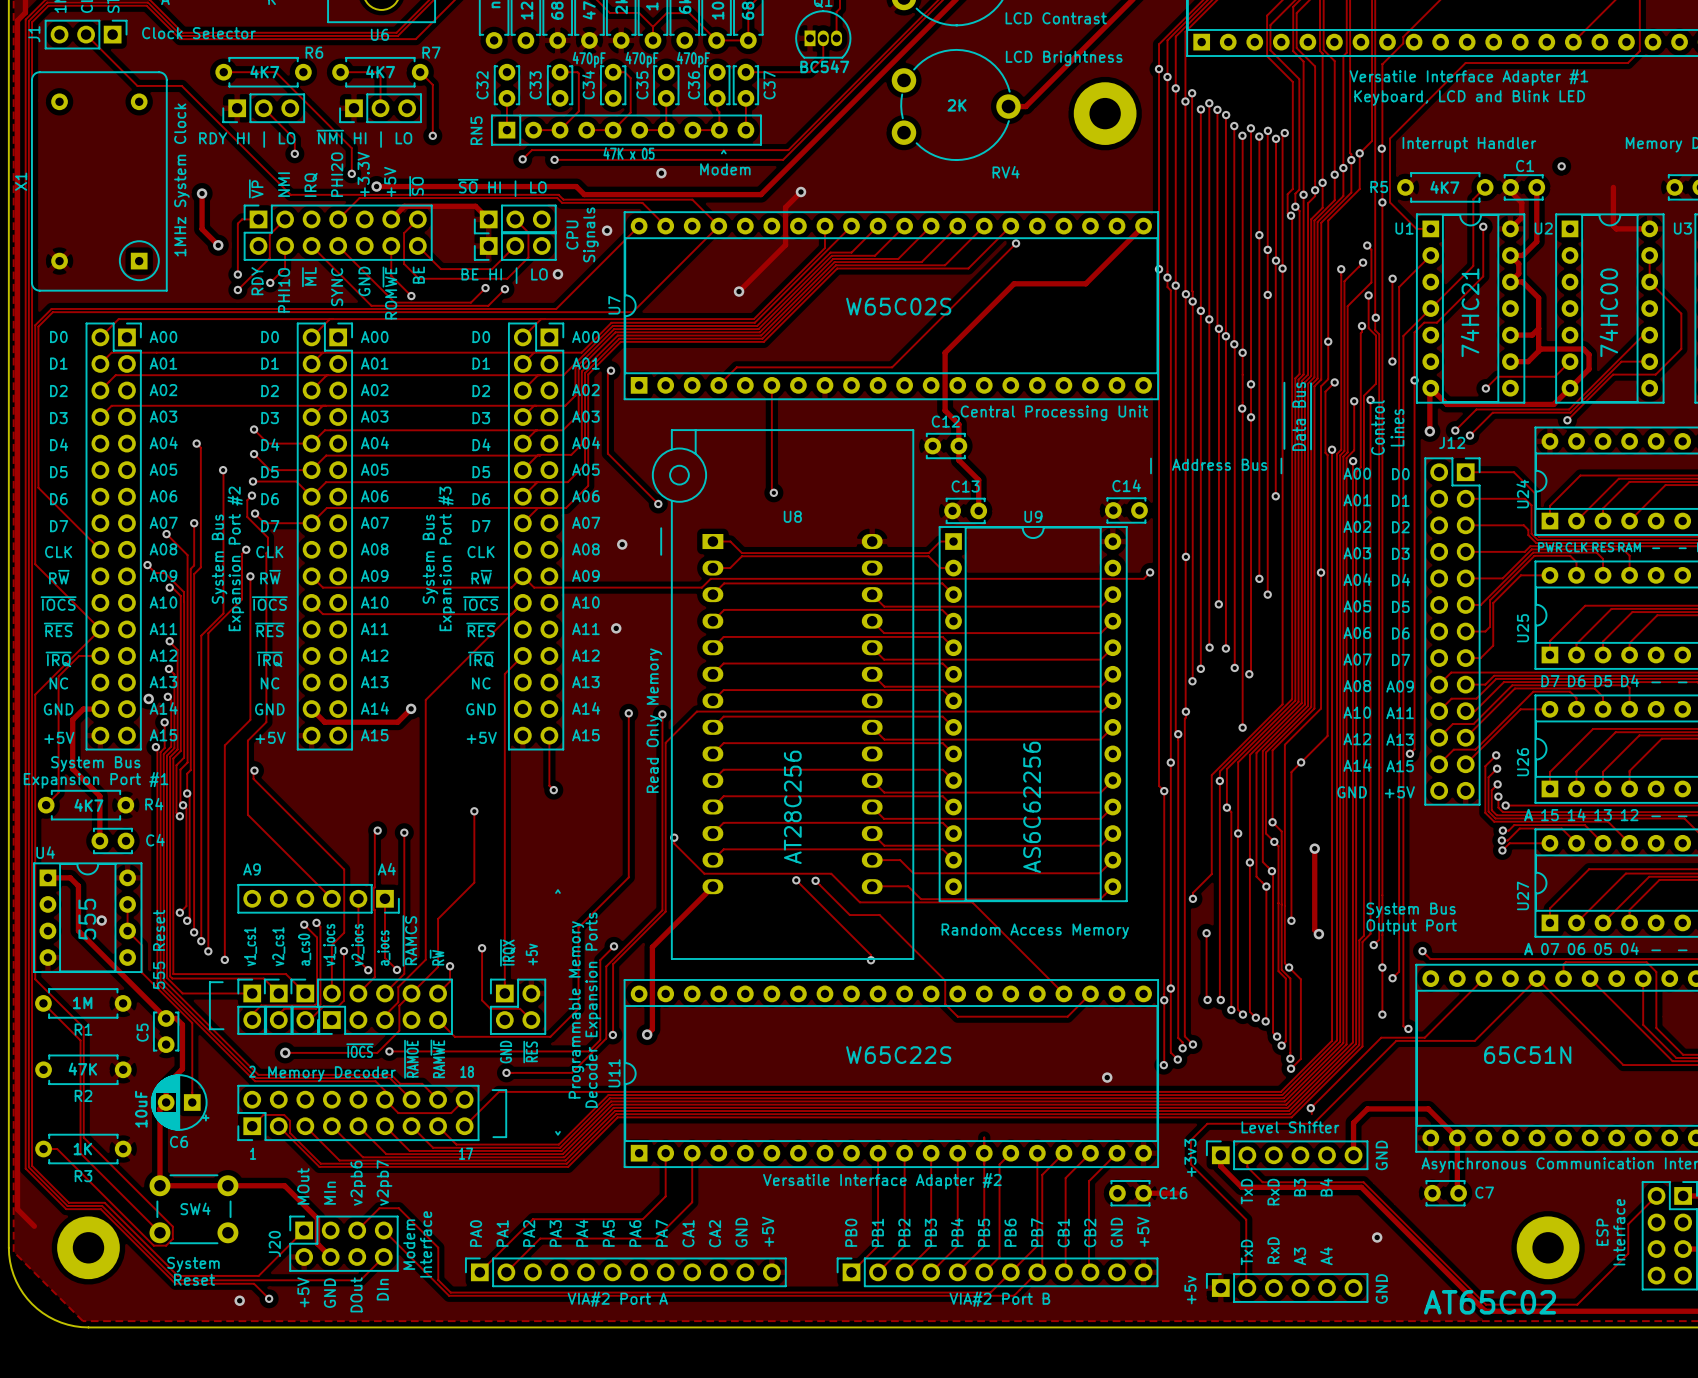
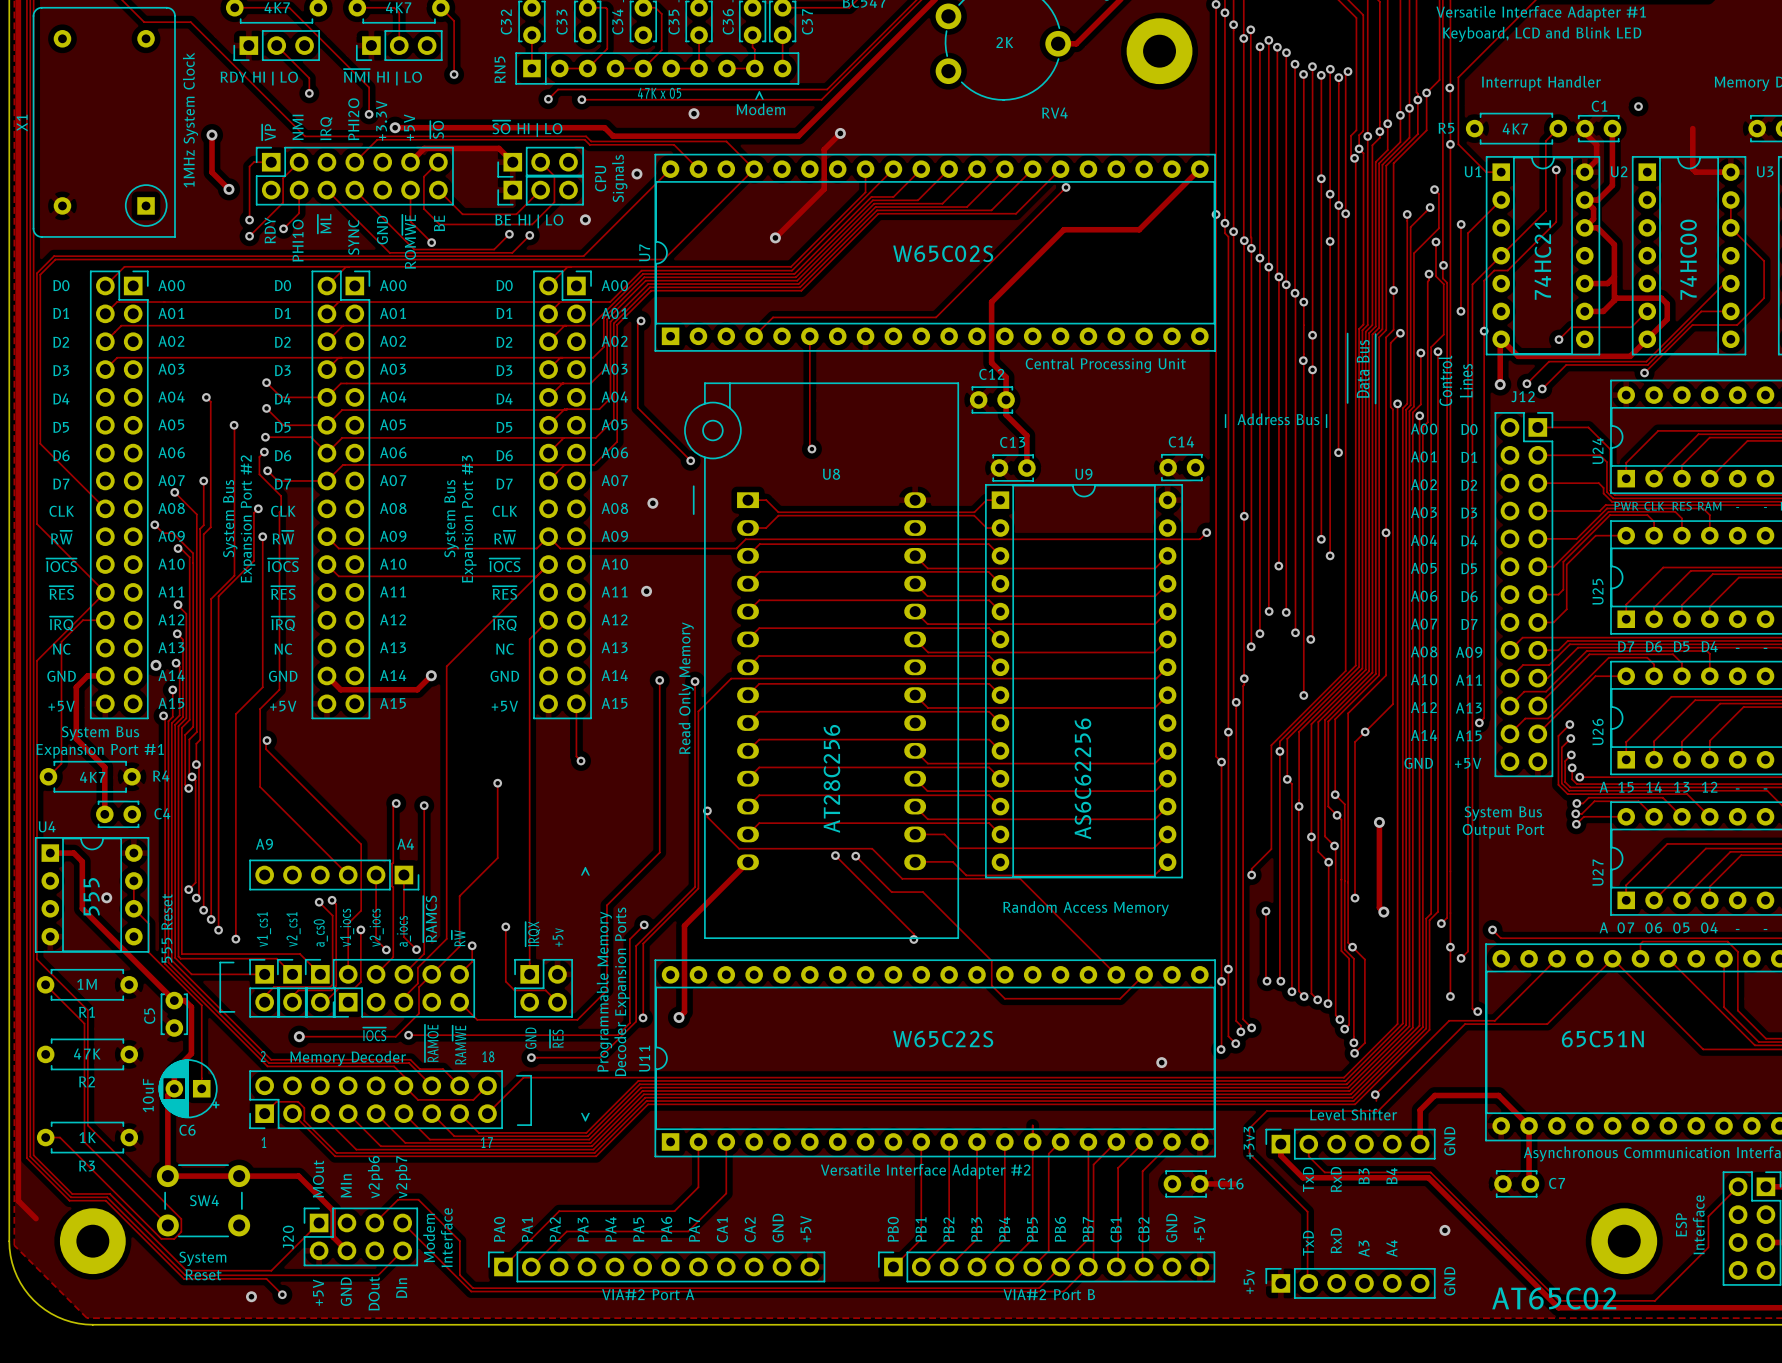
text position: System Bus (1411, 910) -> System Bus (1503, 813)
text position: Output Port (1411, 927) -> Output Port (1503, 831)

